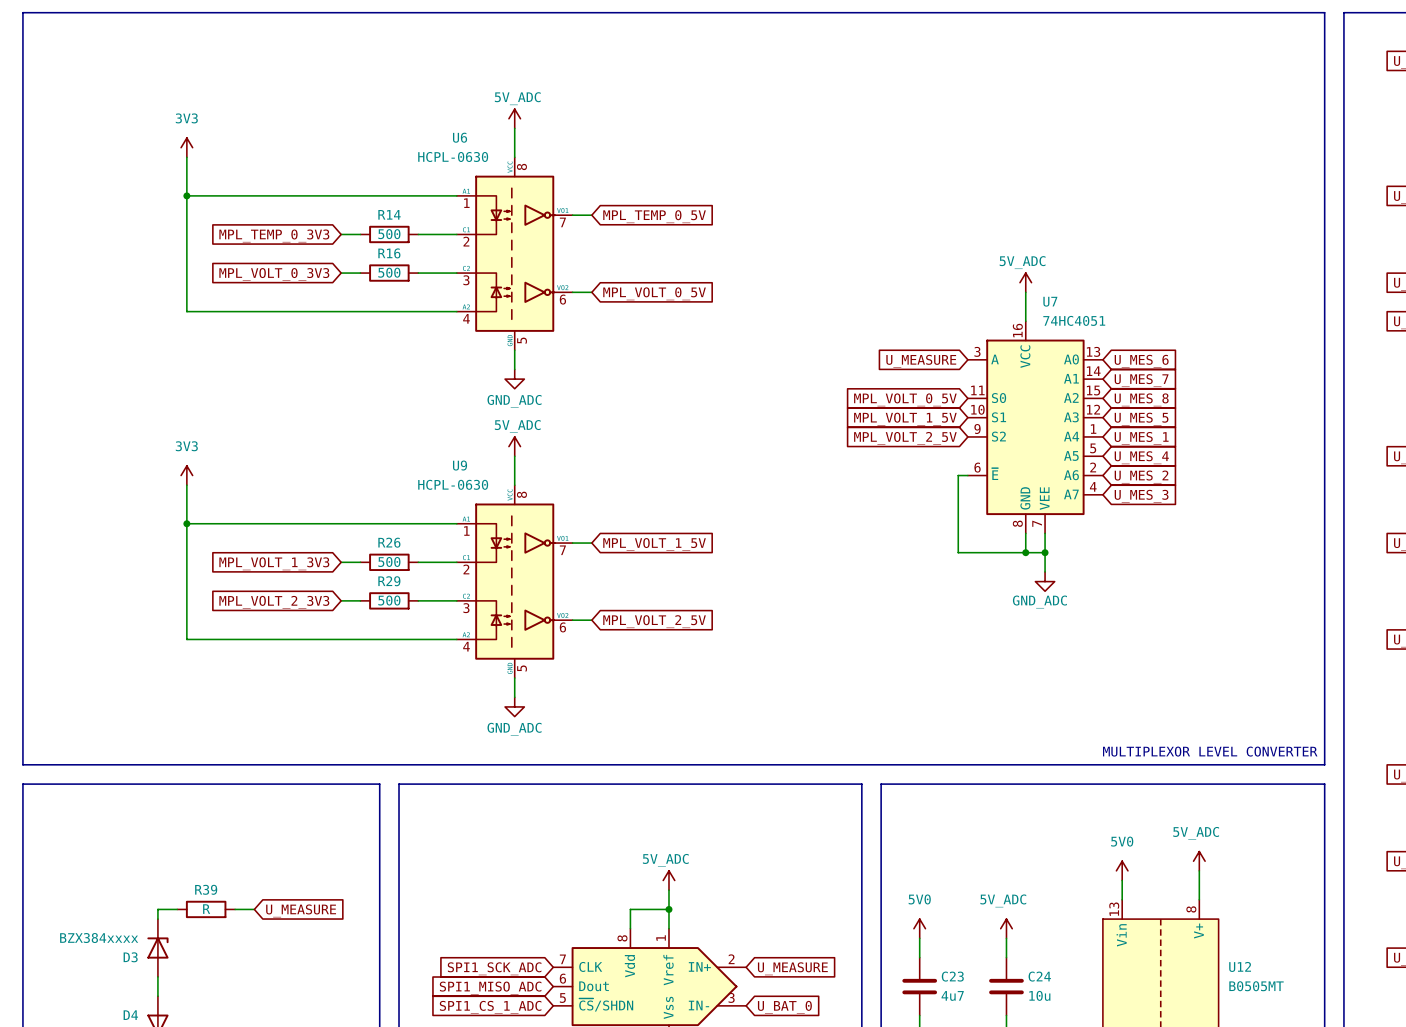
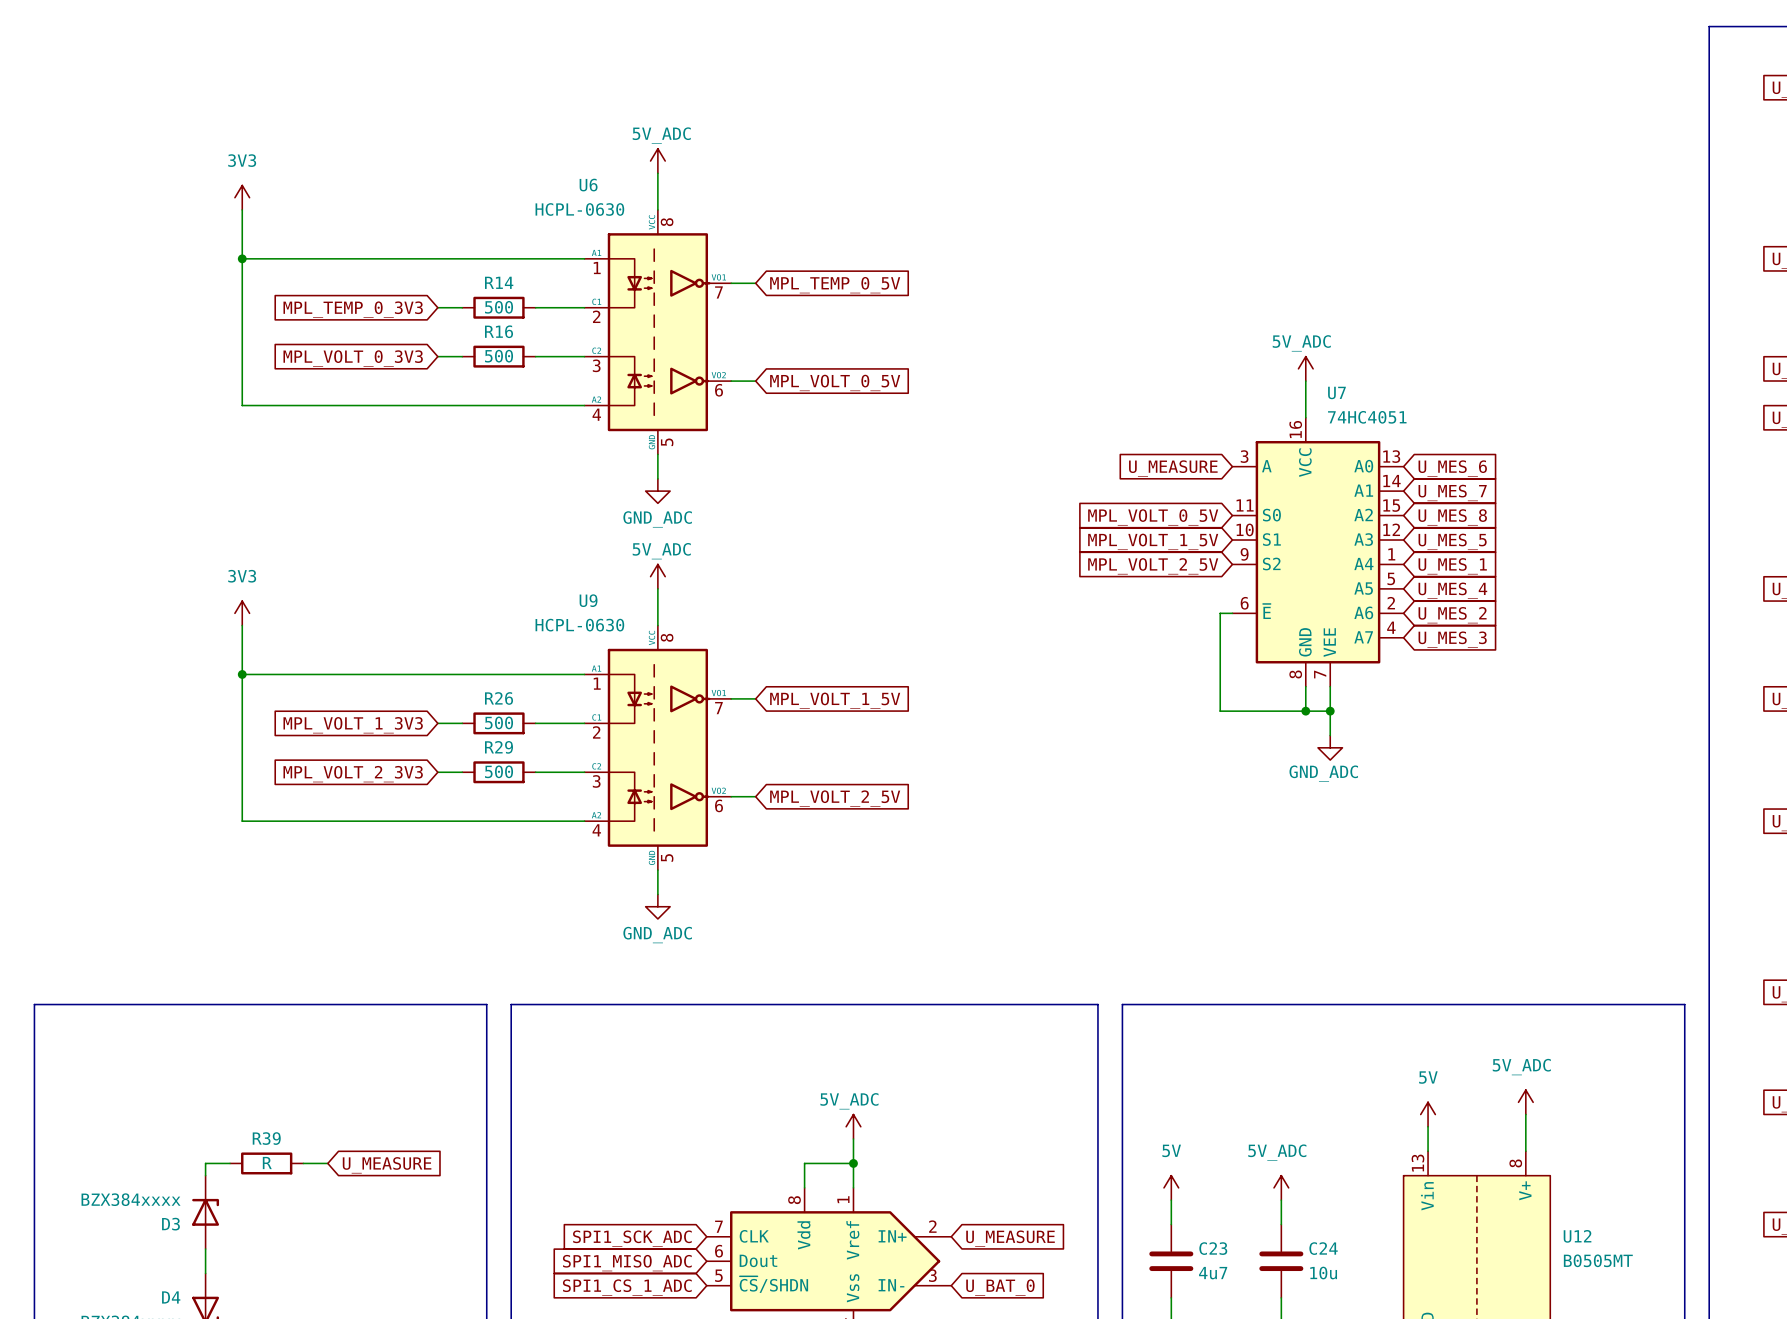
line: (22, 12) (1324, 12) (1324, 764) (22, 764) (22, 12) -> none
text: MULTIPLEXOR LEVEL CONVERTER (1210, 751) -> none
power symbol: 5V0 (1122, 870) -> 5V (1428, 1114)
power symbol: 5V0 (919, 928) -> 5V (1171, 1187)

